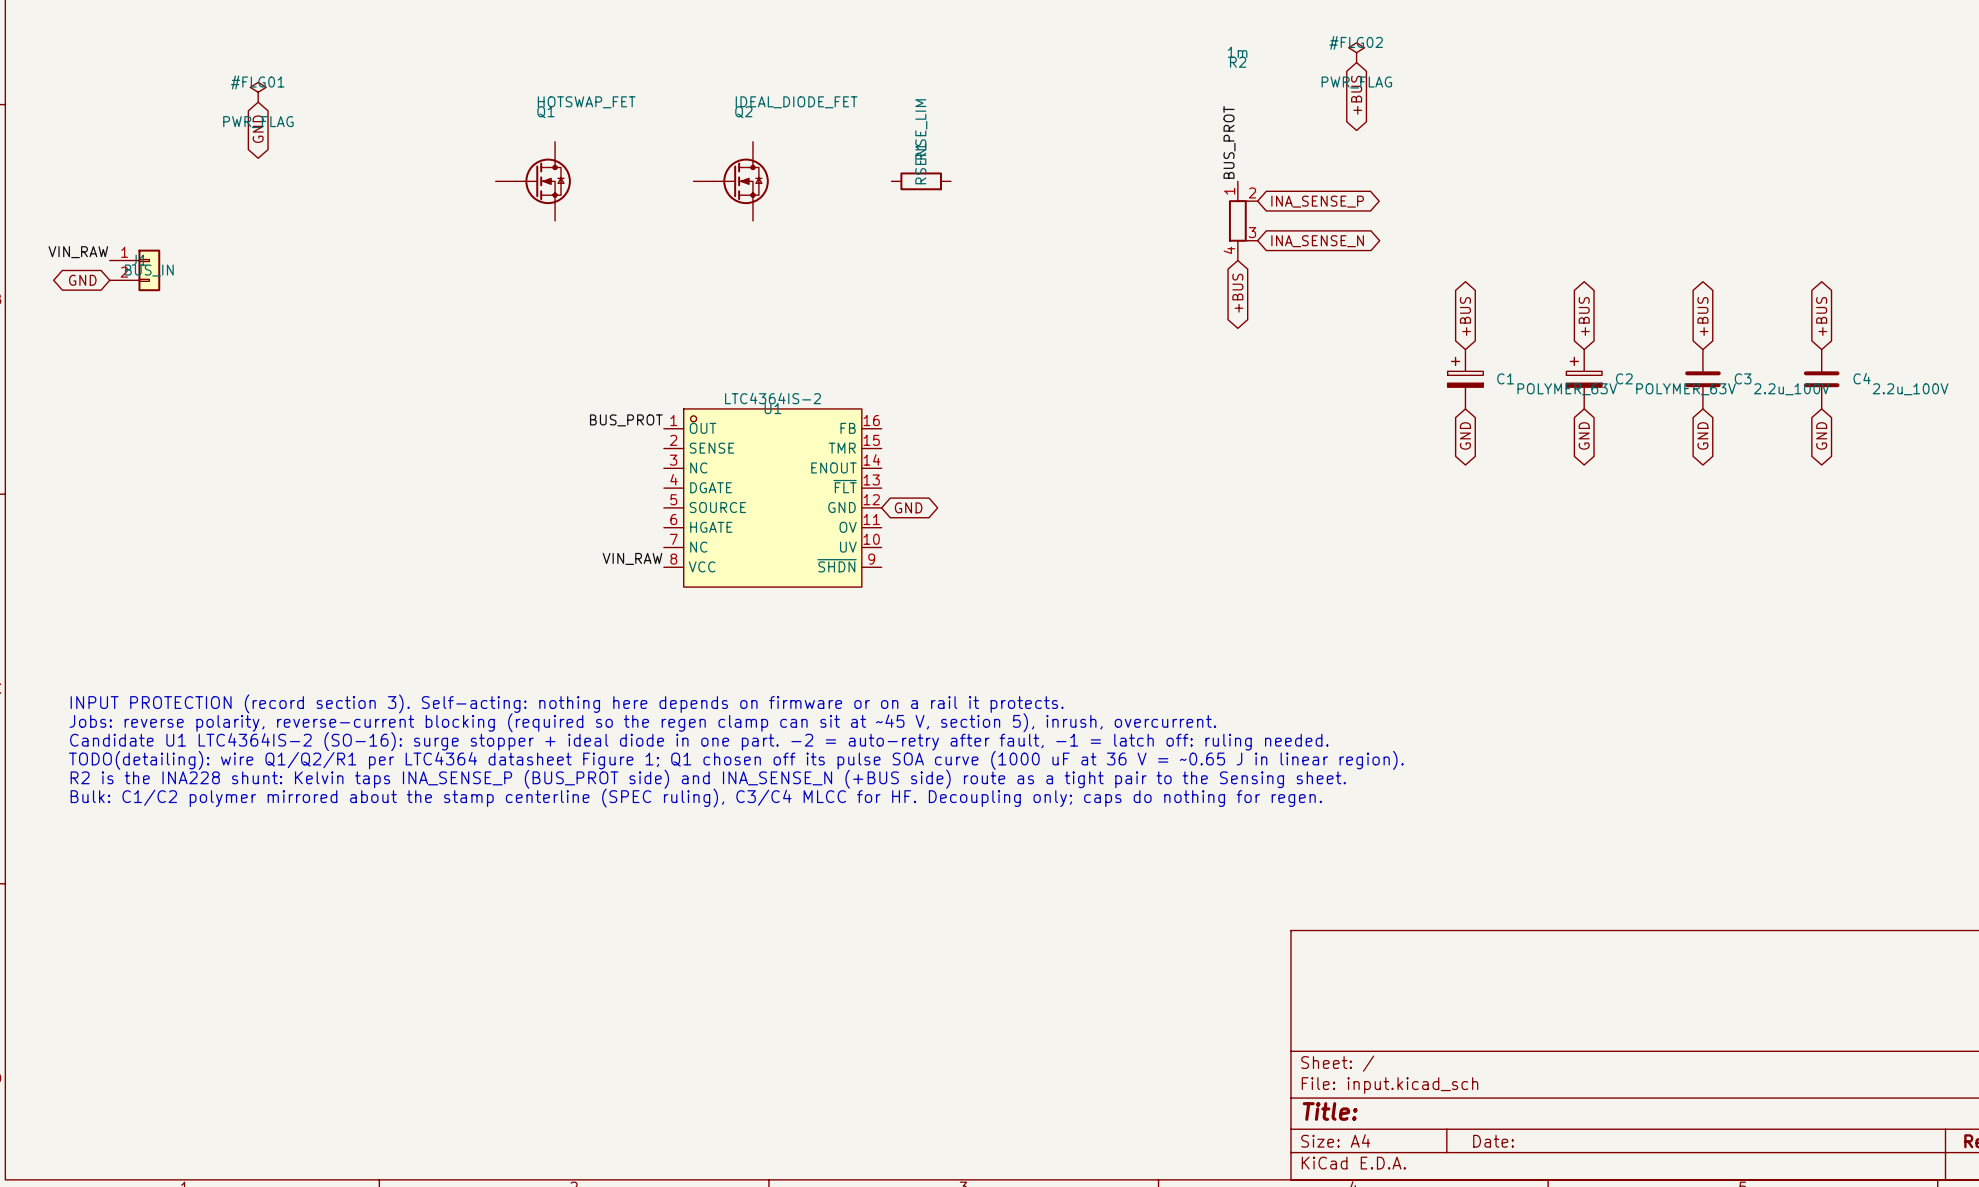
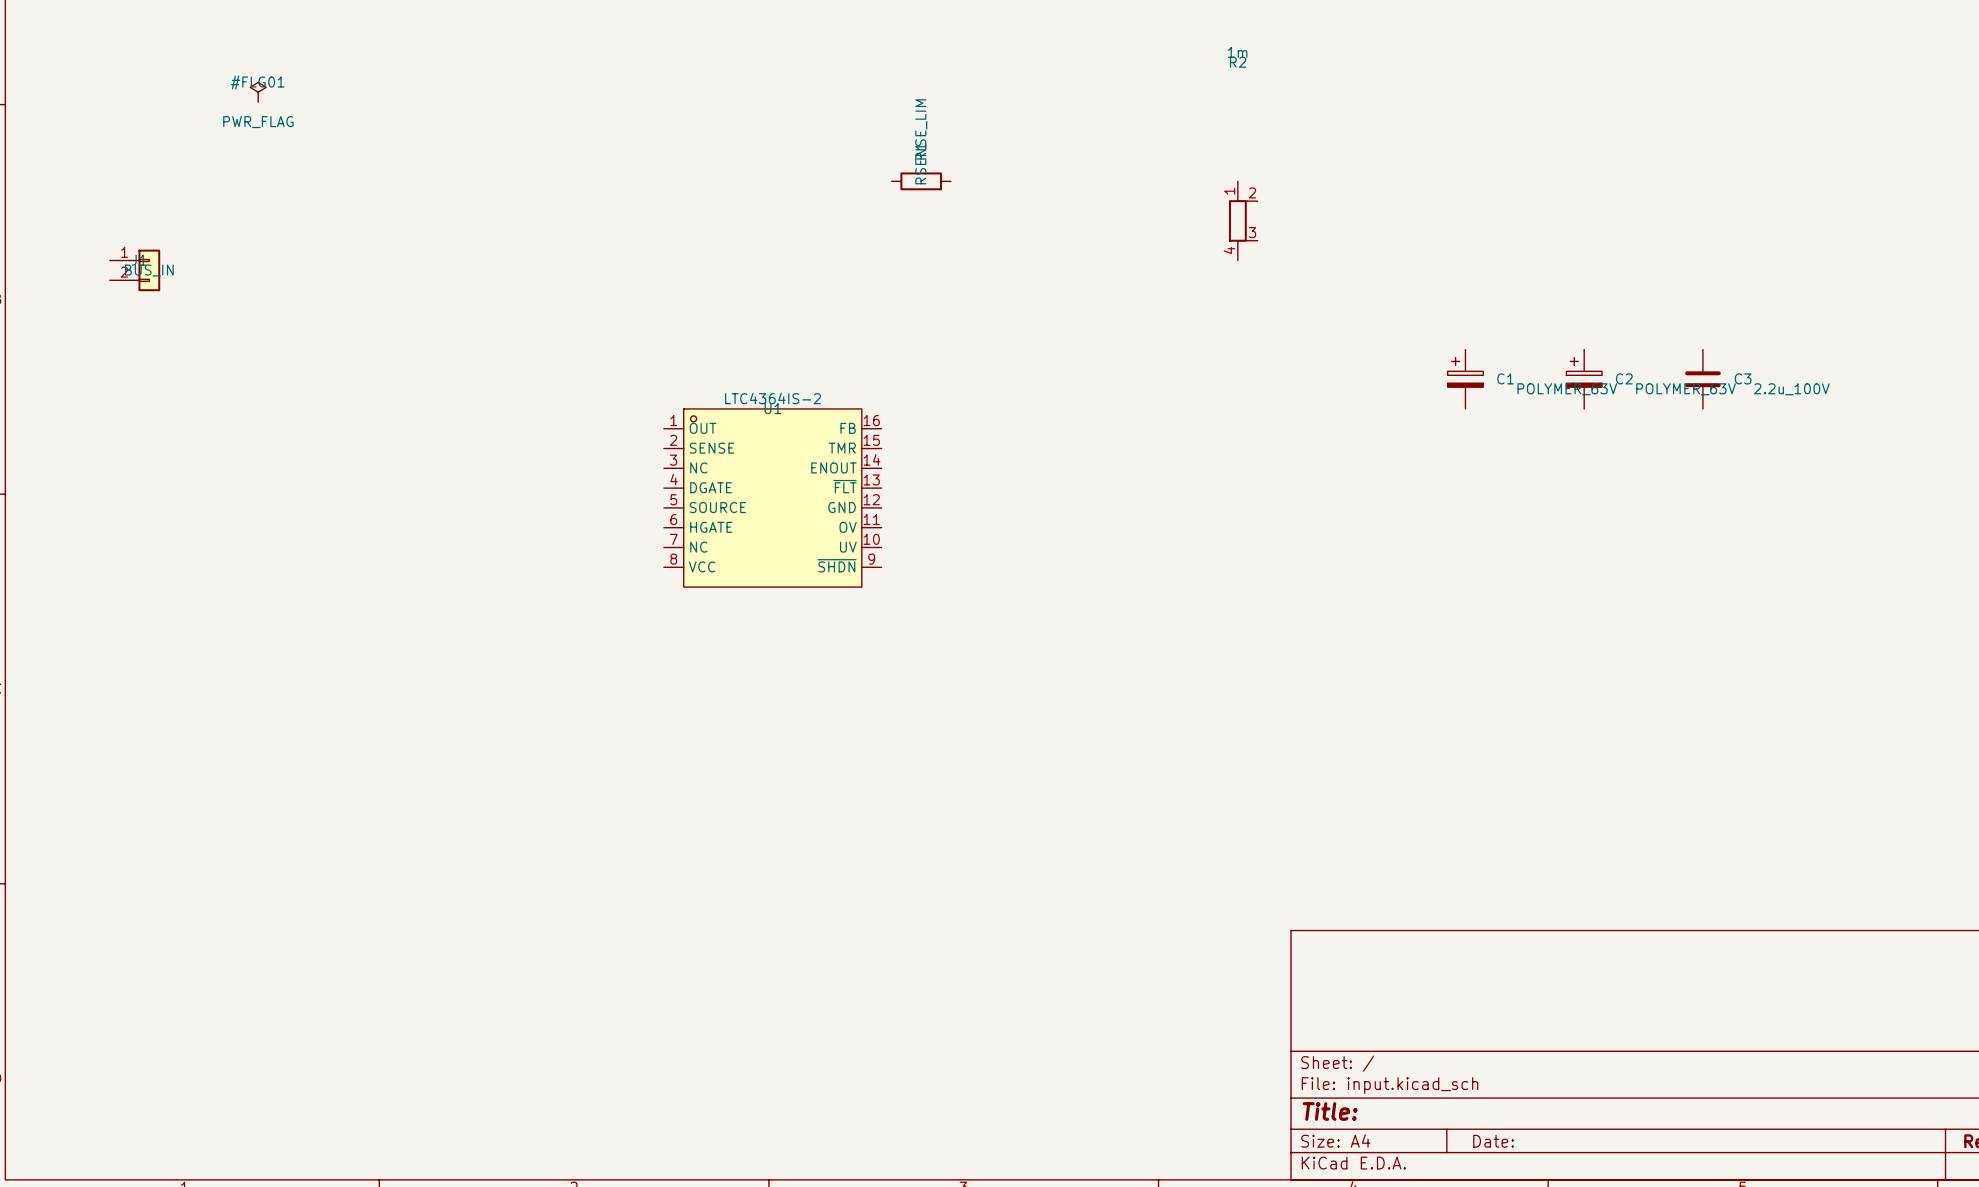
#FLG02: PWR_FLAG (1356, 52) -> none
global label: +BUS (1356, 95) -> none
global label: GND (258, 129) -> none
label: BUS_PROT (1229, 142) -> none
Q1: HOTSWAP_FET (533, 181) -> none
Q2: IDEAL_DIODE_FET (731, 181) -> none
global label: INA_SENSE_P (1317, 201) -> none
global label: INA_SENSE_N (1317, 241) -> none
label: VIN_RAW (78, 252) -> none
global label: GND (82, 280) -> none
global label: +BUS (1237, 293) -> none
global label: +BUS (1465, 316) -> none
global label: +BUS (1584, 316) -> none
global label: +BUS (1702, 316) -> none
global label: +BUS (1821, 316) -> none
C4: 2.2u_100V (1821, 379) -> none
label: BUS_PROT (626, 420) -> none
global label: GND (1465, 435) -> none
global label: GND (1584, 435) -> none
global label: GND (1702, 435) -> none
global label: GND (1821, 435) -> none
global label: GND (908, 507) -> none
label: VIN_RAW (632, 558) -> none
text: INPUT PROTECTION (record section 3). Self-acting: nothing here depends on firmware or on a rail it protects. (567, 703) -> none
text: Jobs: reverse polarity, reverse-current blocking (required so the regen clamp can sit at ~45 V, section 5), inrush, overcurrent. (642, 722) -> none
text: Candidate U1 LTC4364IS-2 (SO-16): surge stopper + ideal diode in one part. -2 = auto-retry after fault, -1 = latch off: ruling needed. (699, 741) -> none
text: TODO(detailing): wire Q1/Q2/R1 per LTC4364 datasheet Figure 1; Q1 chosen off its pulse SOA curve (1000 uF at 36 V = ~0.65 J in linear region). (736, 760) -> none
text: R2 is the INA228 shunt: Kelvin taps INA_SENSE_P (BUS_PROT side) and INA_SENSE_N (+BUS side) route as a tight pair to the Sensing sheet. (708, 779) -> none
text: Bulk: C1/C2 polymer mirrored about the stamp centerline (SPEC ruling), C3/C4 MLCC for HF. Decoupling only; caps do nothing for regen. (696, 798) -> none

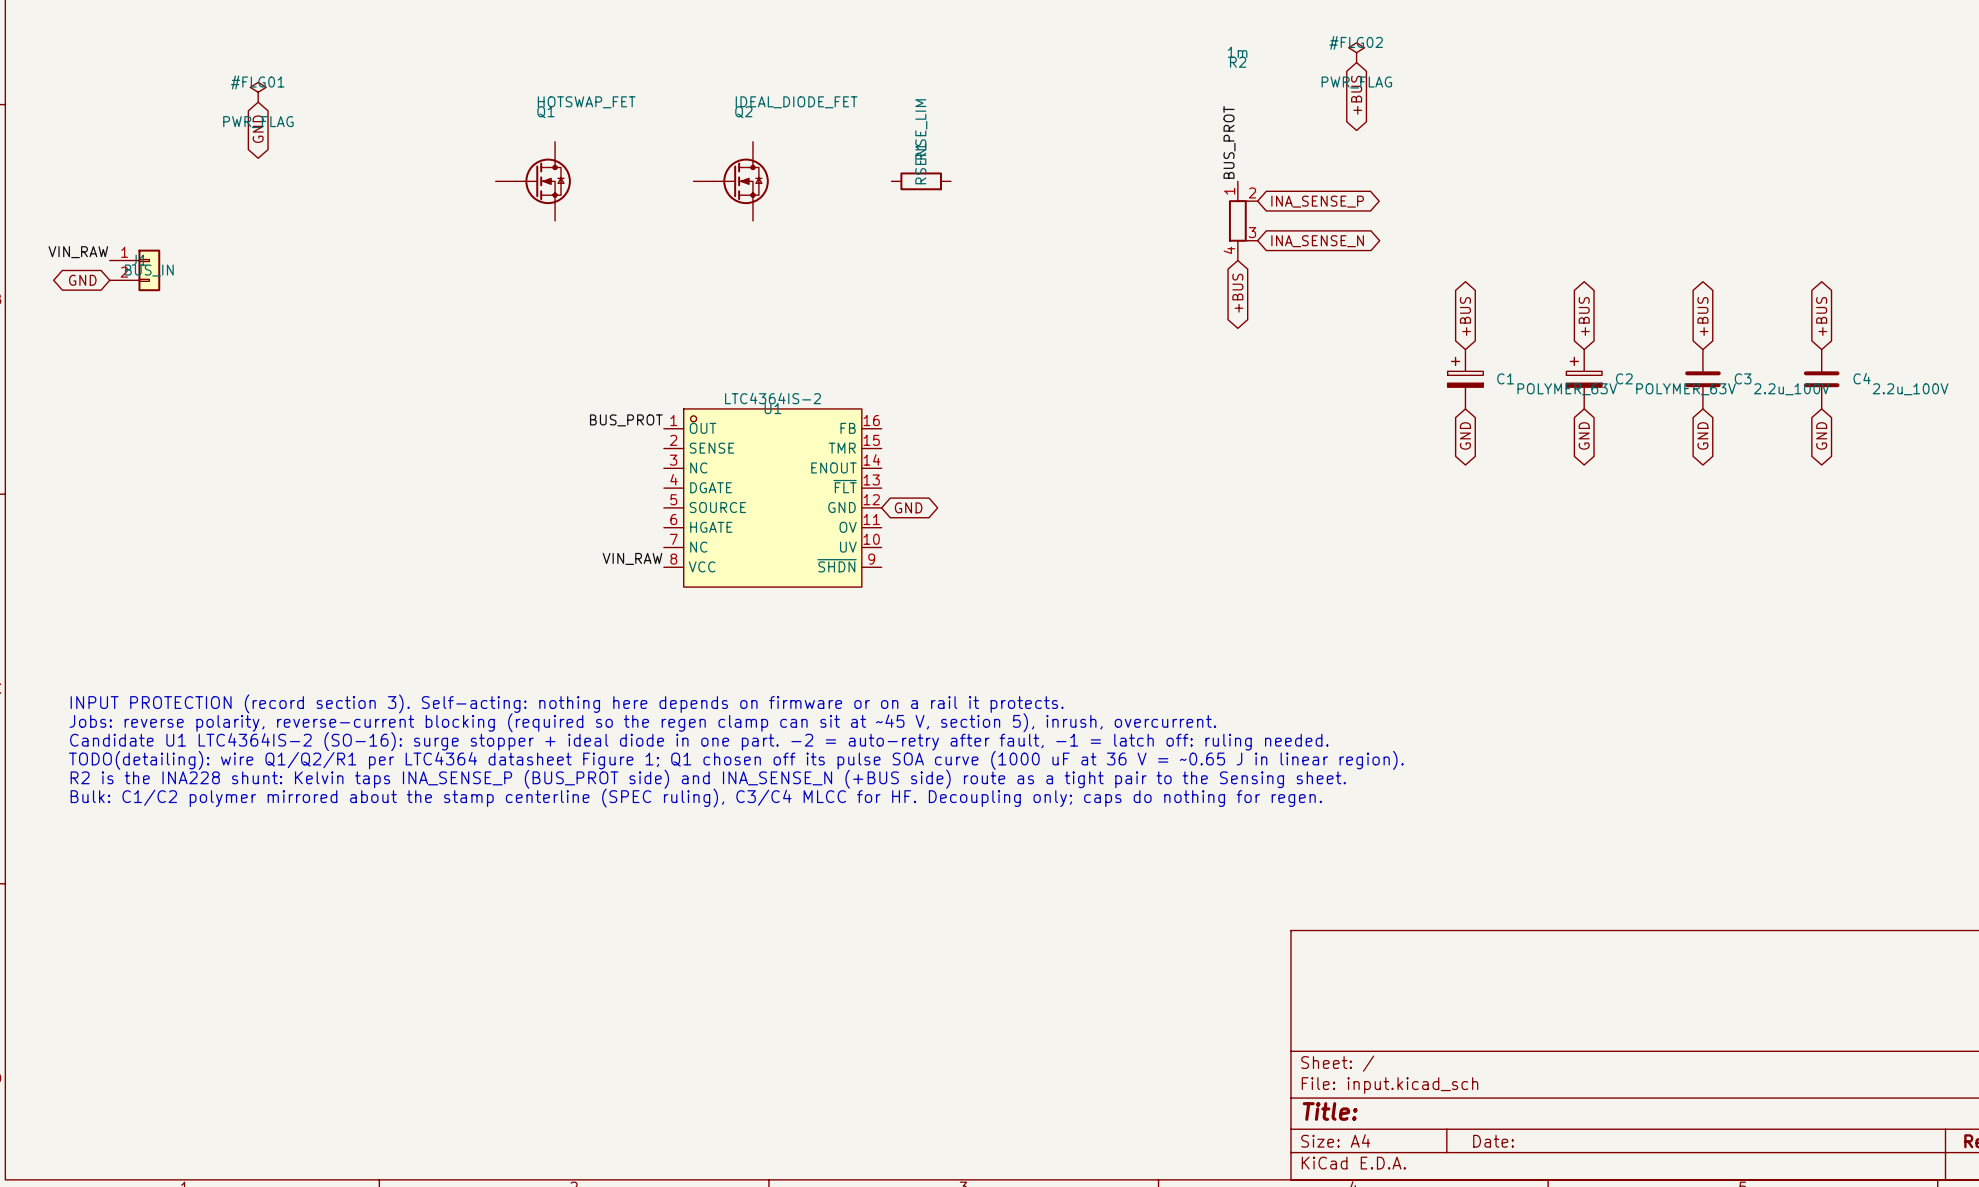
#FLG02: none -> PWR_FLAG (1356, 52)
global label: none -> +BUS (1356, 95)
global label: none -> GND (258, 129)
label: none -> BUS_PROT (1229, 142)
Q1: none -> HOTSWAP_FET (533, 181)
Q2: none -> IDEAL_DIODE_FET (731, 181)
global label: none -> INA_SENSE_P (1317, 201)
global label: none -> INA_SENSE_N (1317, 241)
label: none -> VIN_RAW (78, 252)
global label: none -> GND (82, 280)
global label: none -> +BUS (1237, 293)
global label: none -> +BUS (1465, 316)
global label: none -> +BUS (1584, 316)
global label: none -> +BUS (1702, 316)
global label: none -> +BUS (1821, 316)
C4: none -> 2.2u_100V (1821, 379)
label: none -> BUS_PROT (626, 420)
global label: none -> GND (1465, 435)
global label: none -> GND (1584, 435)
global label: none -> GND (1702, 435)
global label: none -> GND (1821, 435)
global label: none -> GND (908, 507)
label: none -> VIN_RAW (632, 558)
text: none -> INPUT PROTECTION (record section 3). Self-acting: nothing here depends on firmware or on a rail it protects. (567, 703)
text: none -> Jobs: reverse polarity, reverse-current blocking (required so the regen clamp can sit at ~45 V, section 5), inrush, overcurrent. (642, 722)
text: none -> Candidate U1 LTC4364IS-2 (SO-16): surge stopper + ideal diode in one part. -2 = auto-retry after fault, -1 = latch off: ruling needed. (699, 741)
text: none -> TODO(detailing): wire Q1/Q2/R1 per LTC4364 datasheet Figure 1; Q1 chosen off its pulse SOA curve (1000 uF at 36 V = ~0.65 J in linear region). (736, 760)
text: none -> R2 is the INA228 shunt: Kelvin taps INA_SENSE_P (BUS_PROT side) and INA_SENSE_N (+BUS side) route as a tight pair to the Sensing sheet. (708, 779)
text: none -> Bulk: C1/C2 polymer mirrored about the stamp centerline (SPEC ruling), C3/C4 MLCC for HF. Decoupling only; caps do nothing for regen. (696, 798)

